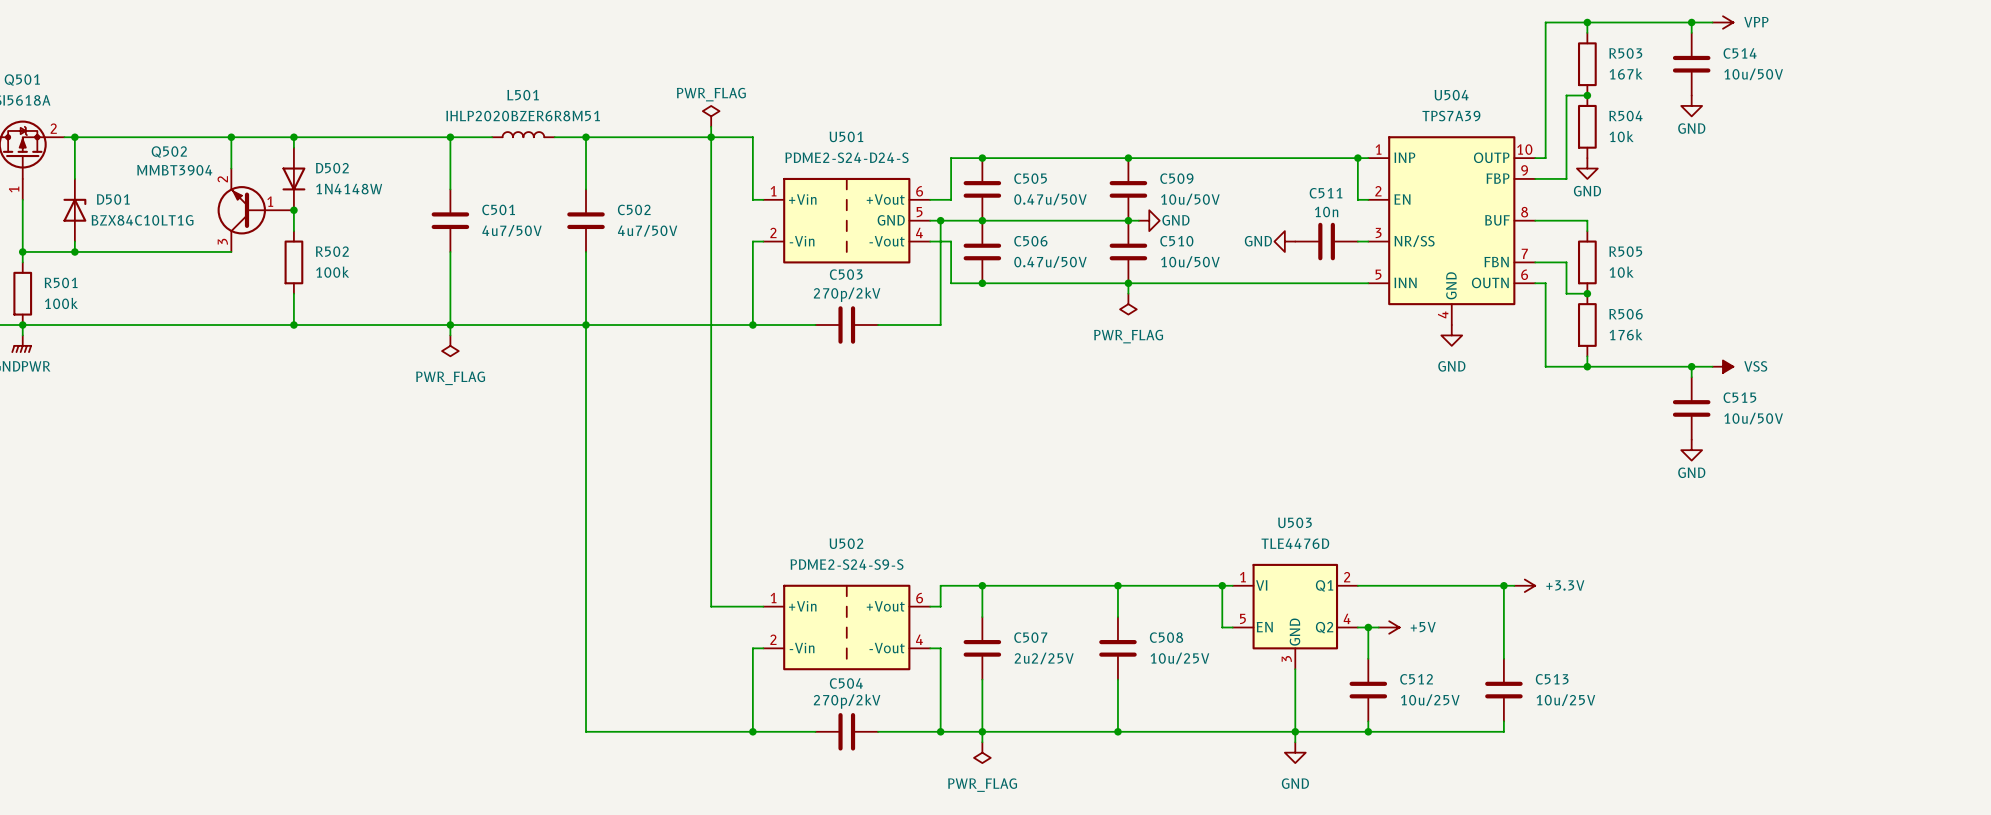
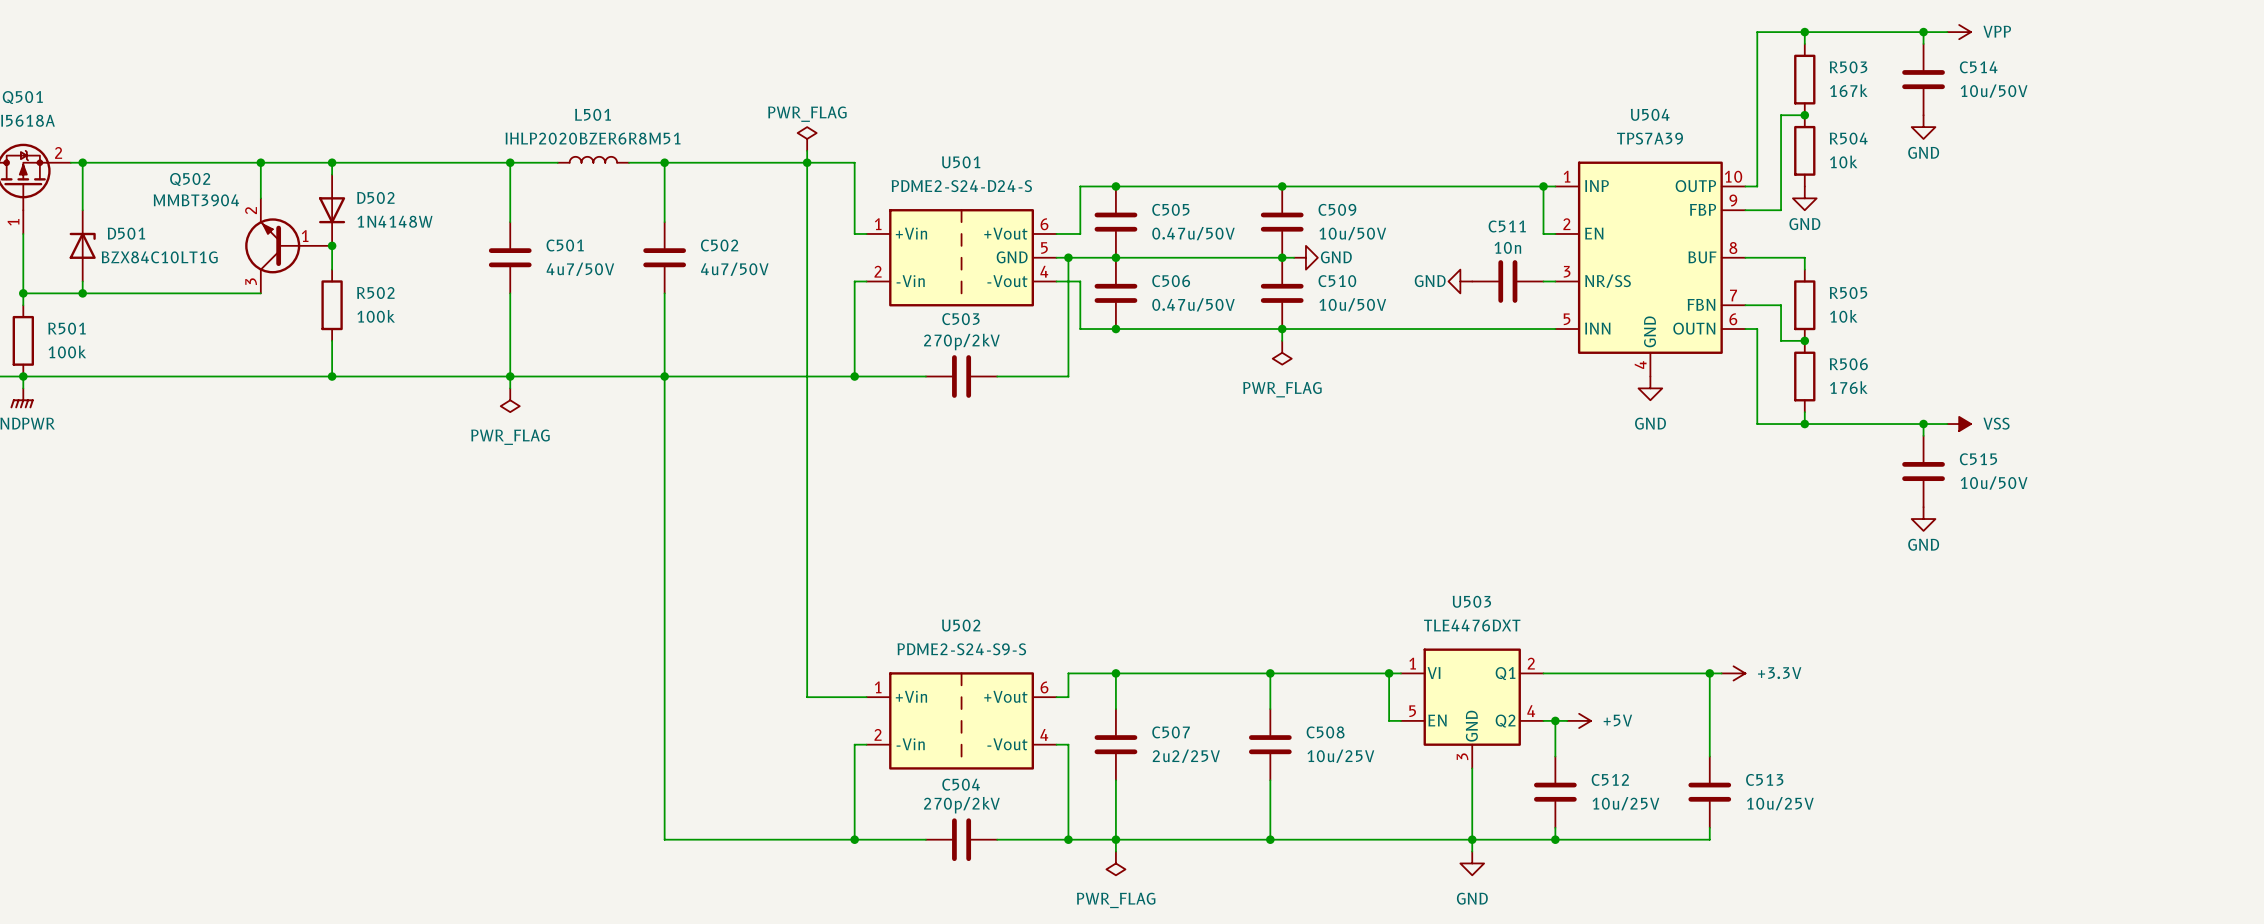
U503 value: TLE4476D (1295, 543) -> TLE4476DXT (1472, 625)

